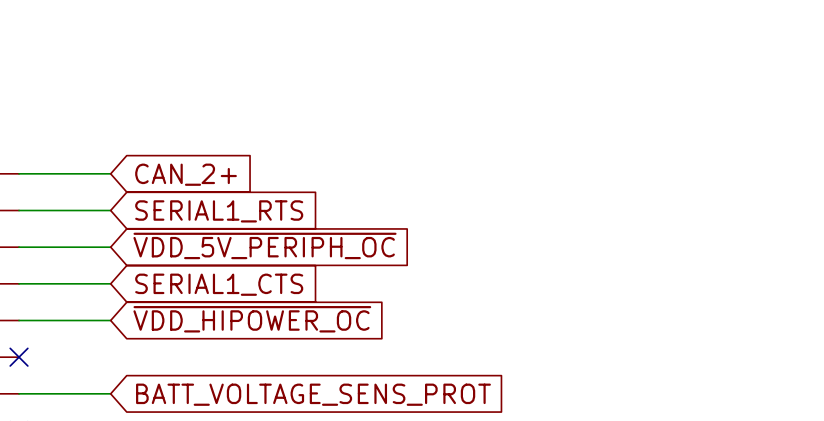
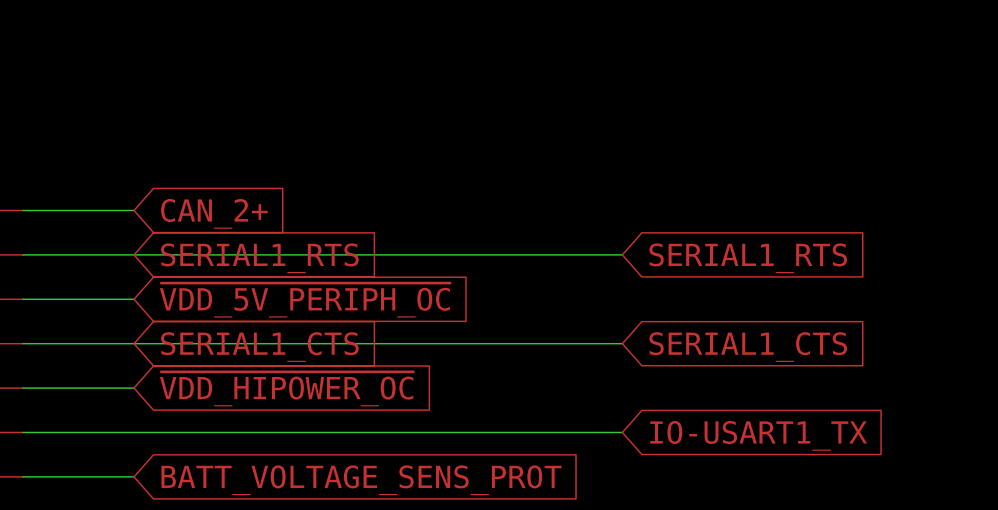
wire: none -> (134, 254) (622, 254)
global label: none -> SERIAL1_RTS (748, 258)
wire: none -> (134, 343) (622, 343)
global label: none -> SERIAL1_CTS (748, 347)
wire: none -> (23, 432) (622, 432)
no-connect mark: (19, 357) -> none
global label: none -> IO-USART1_TX (758, 435)

